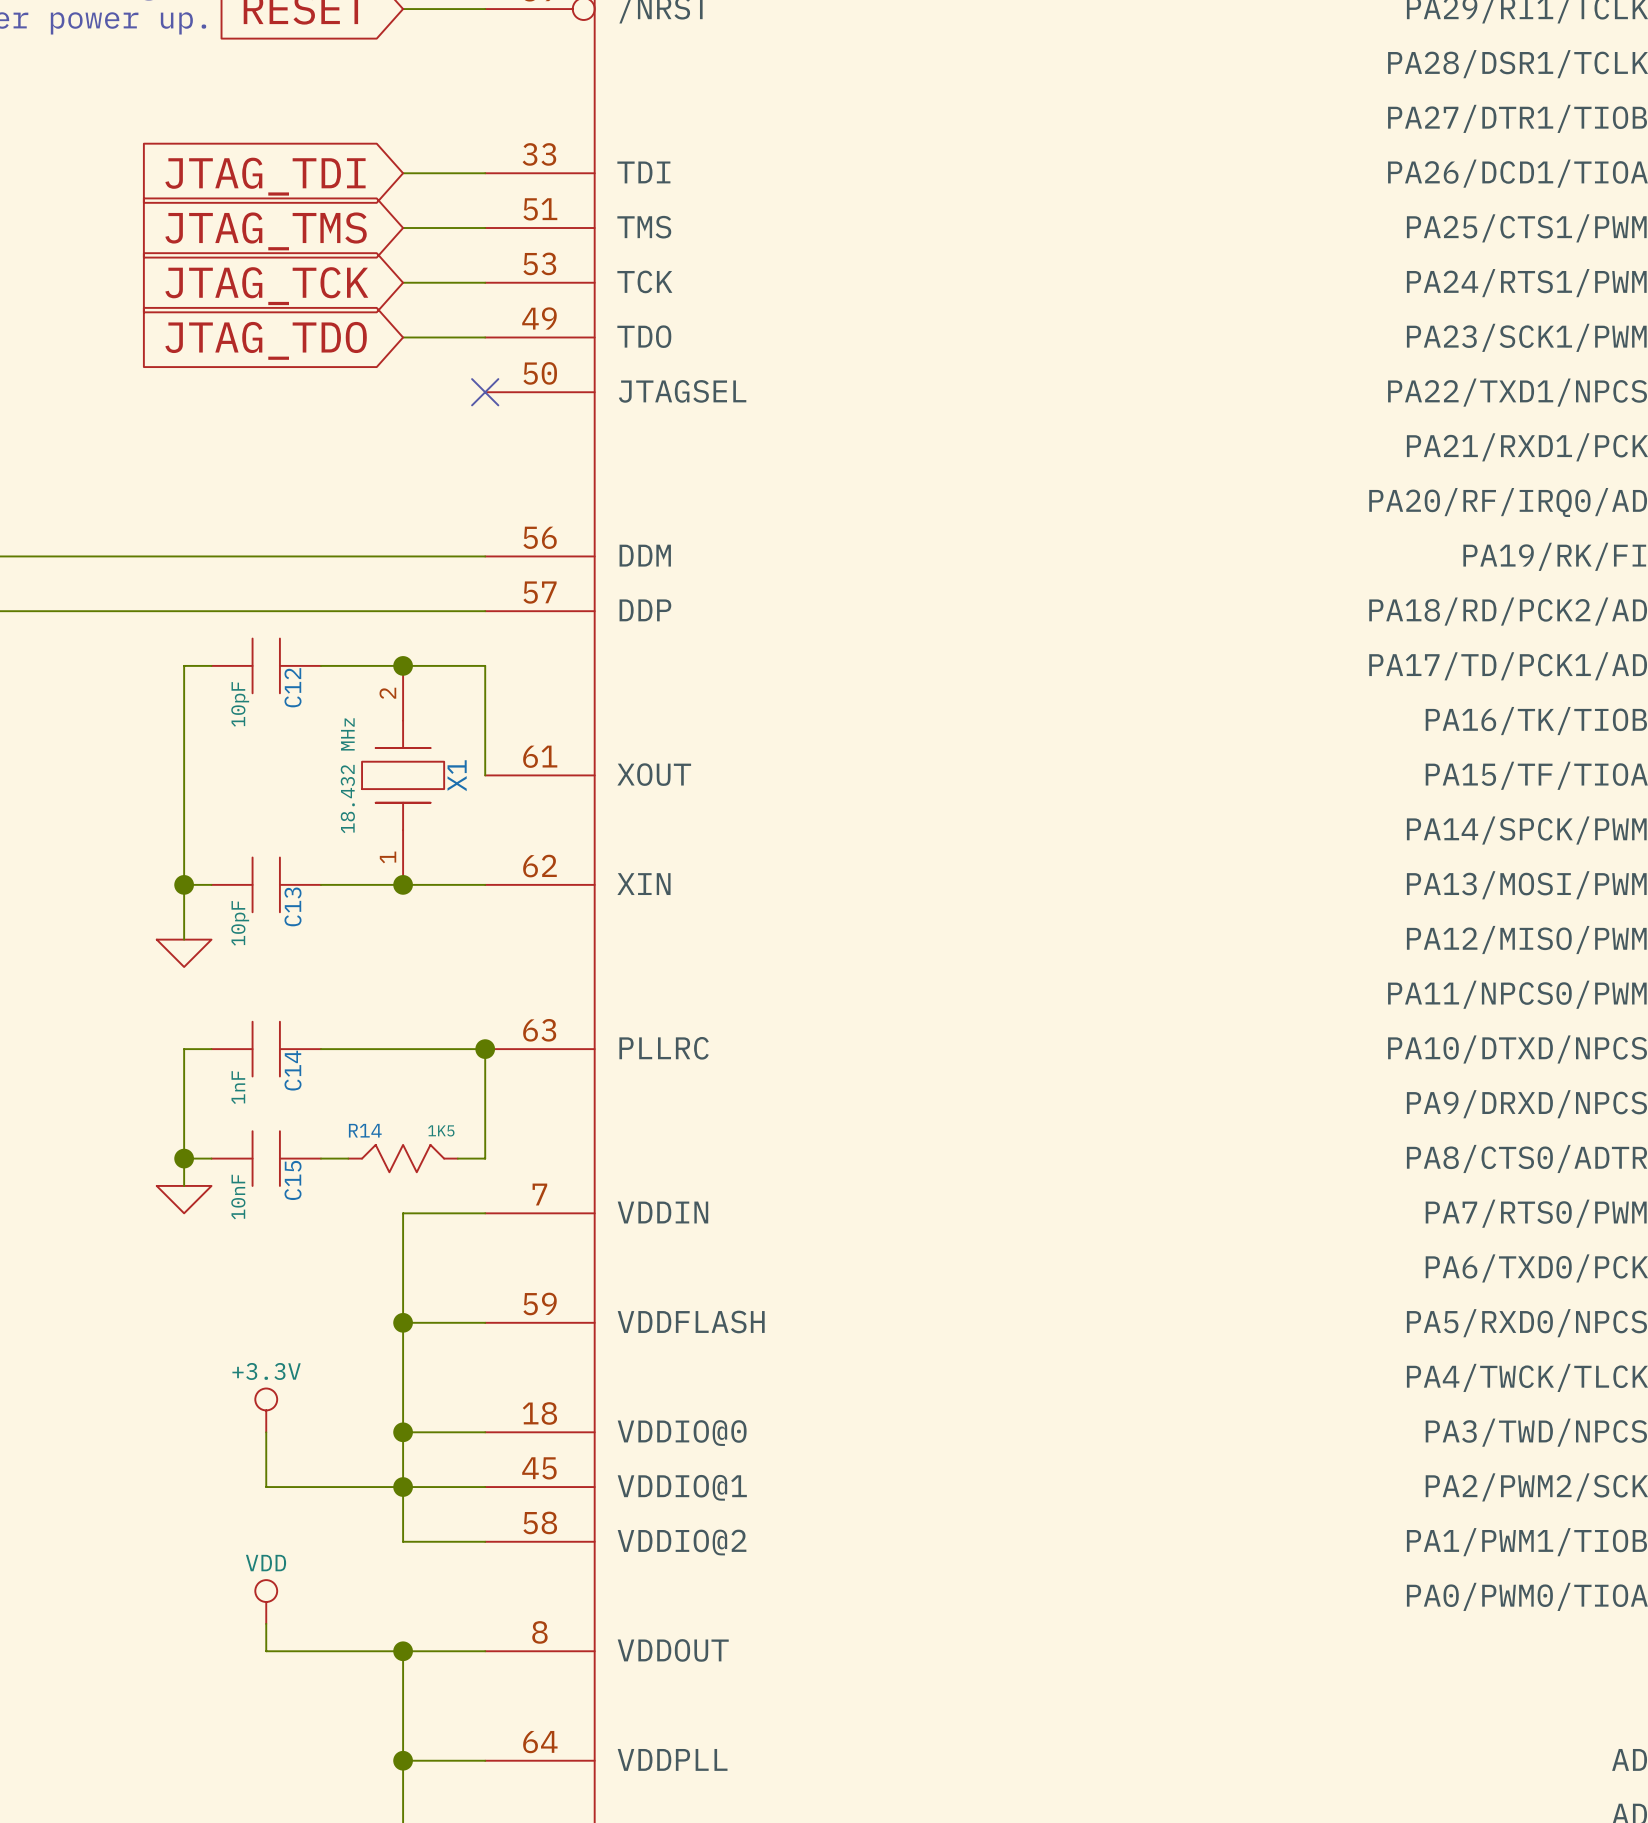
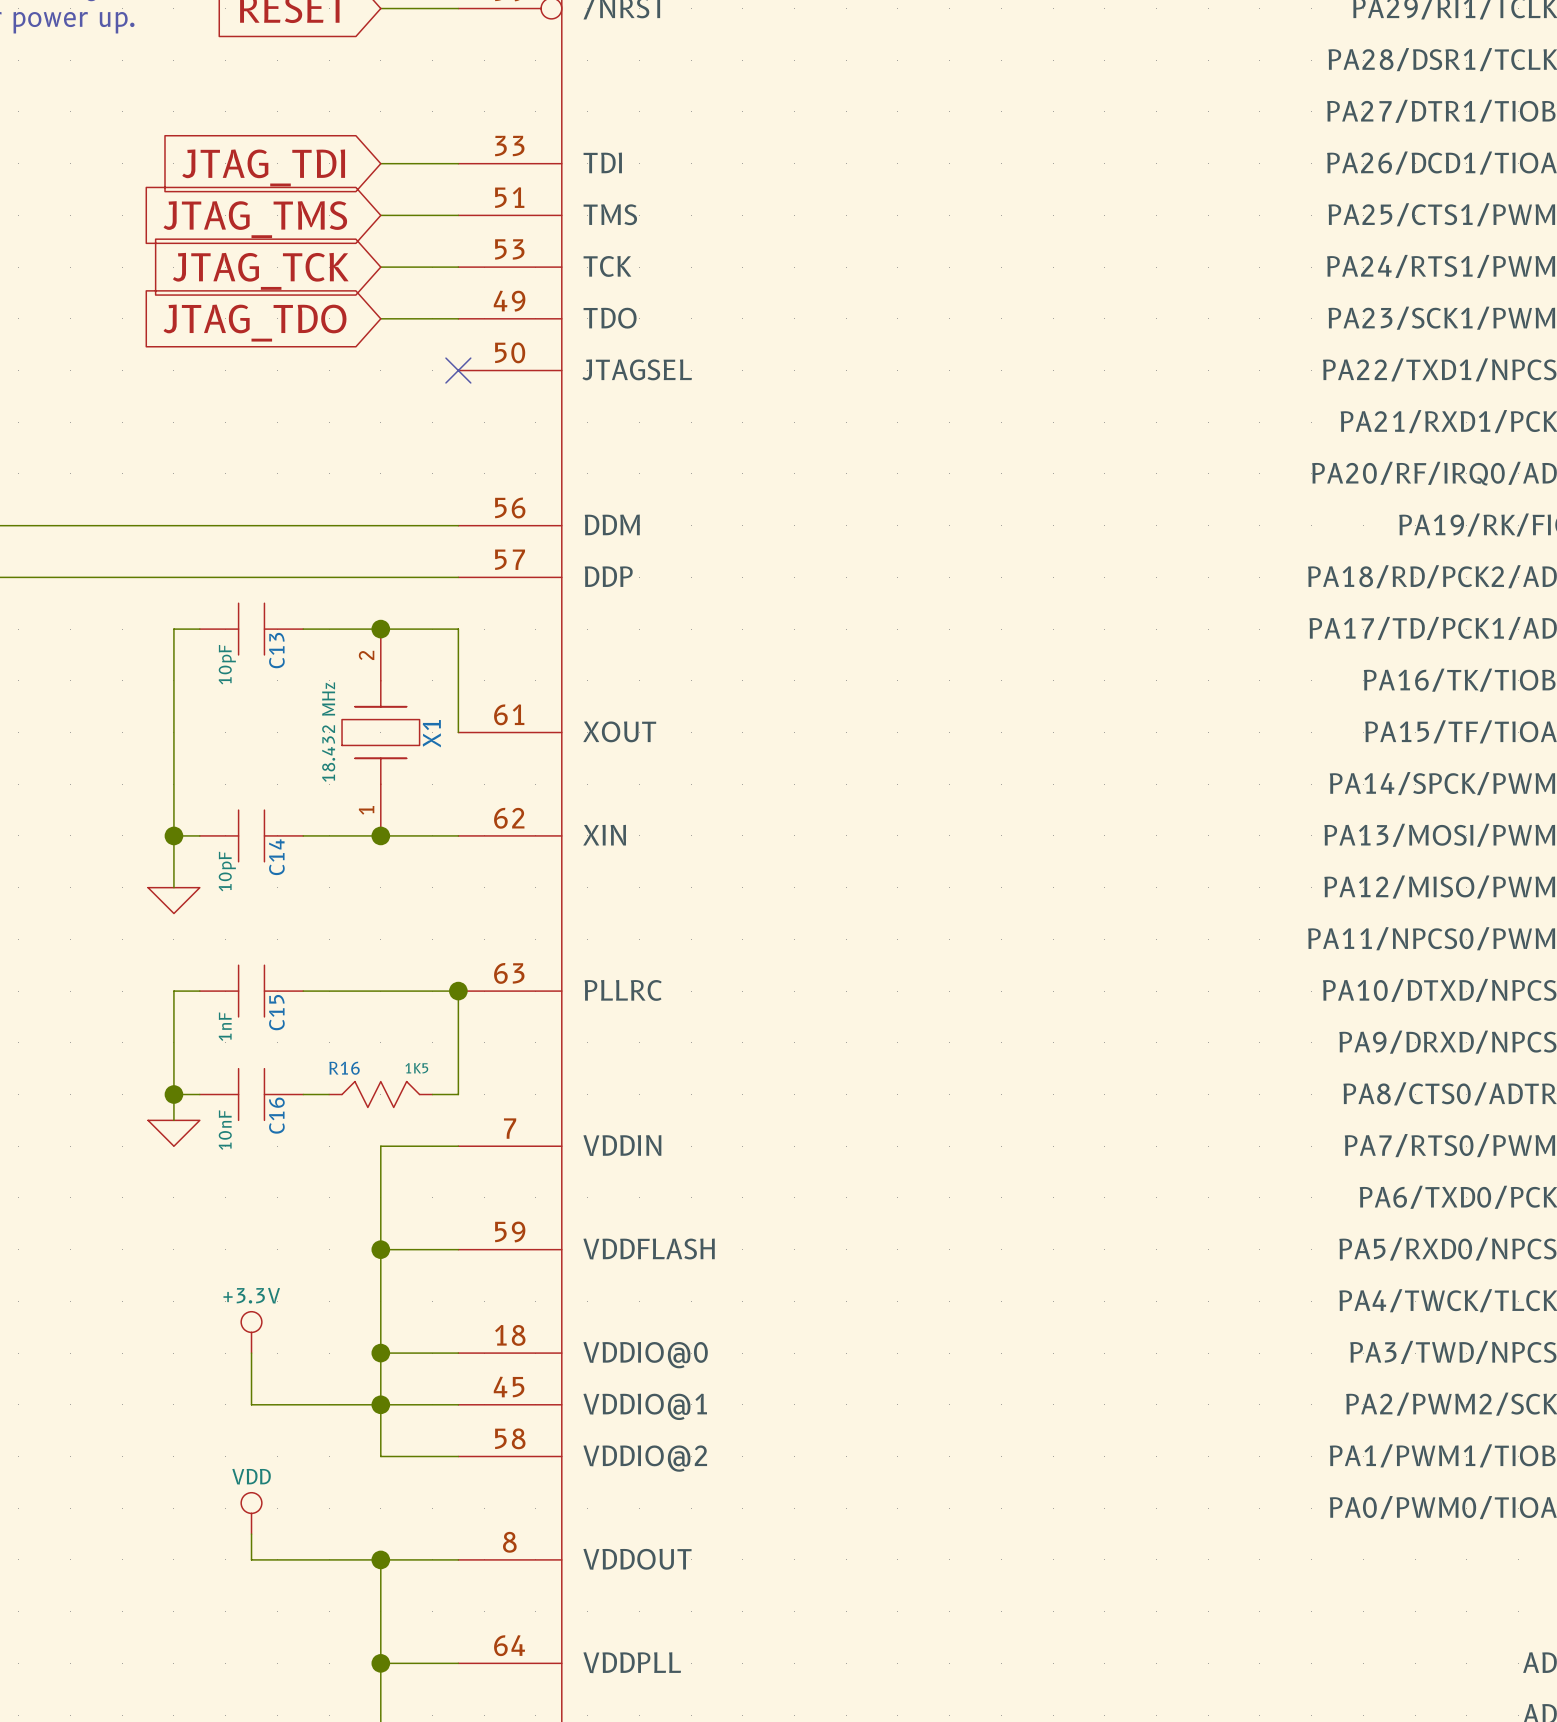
C12 name: C12 (293, 687) -> C13 (276, 650)
C13 name: C13 (293, 906) -> C14 (276, 857)
C14 name: C14 (293, 1070) -> C15 (276, 1012)
R14 name: R14 (365, 1130) -> R16 (344, 1068)
C15 name: C15 (293, 1180) -> C16 (276, 1115)

